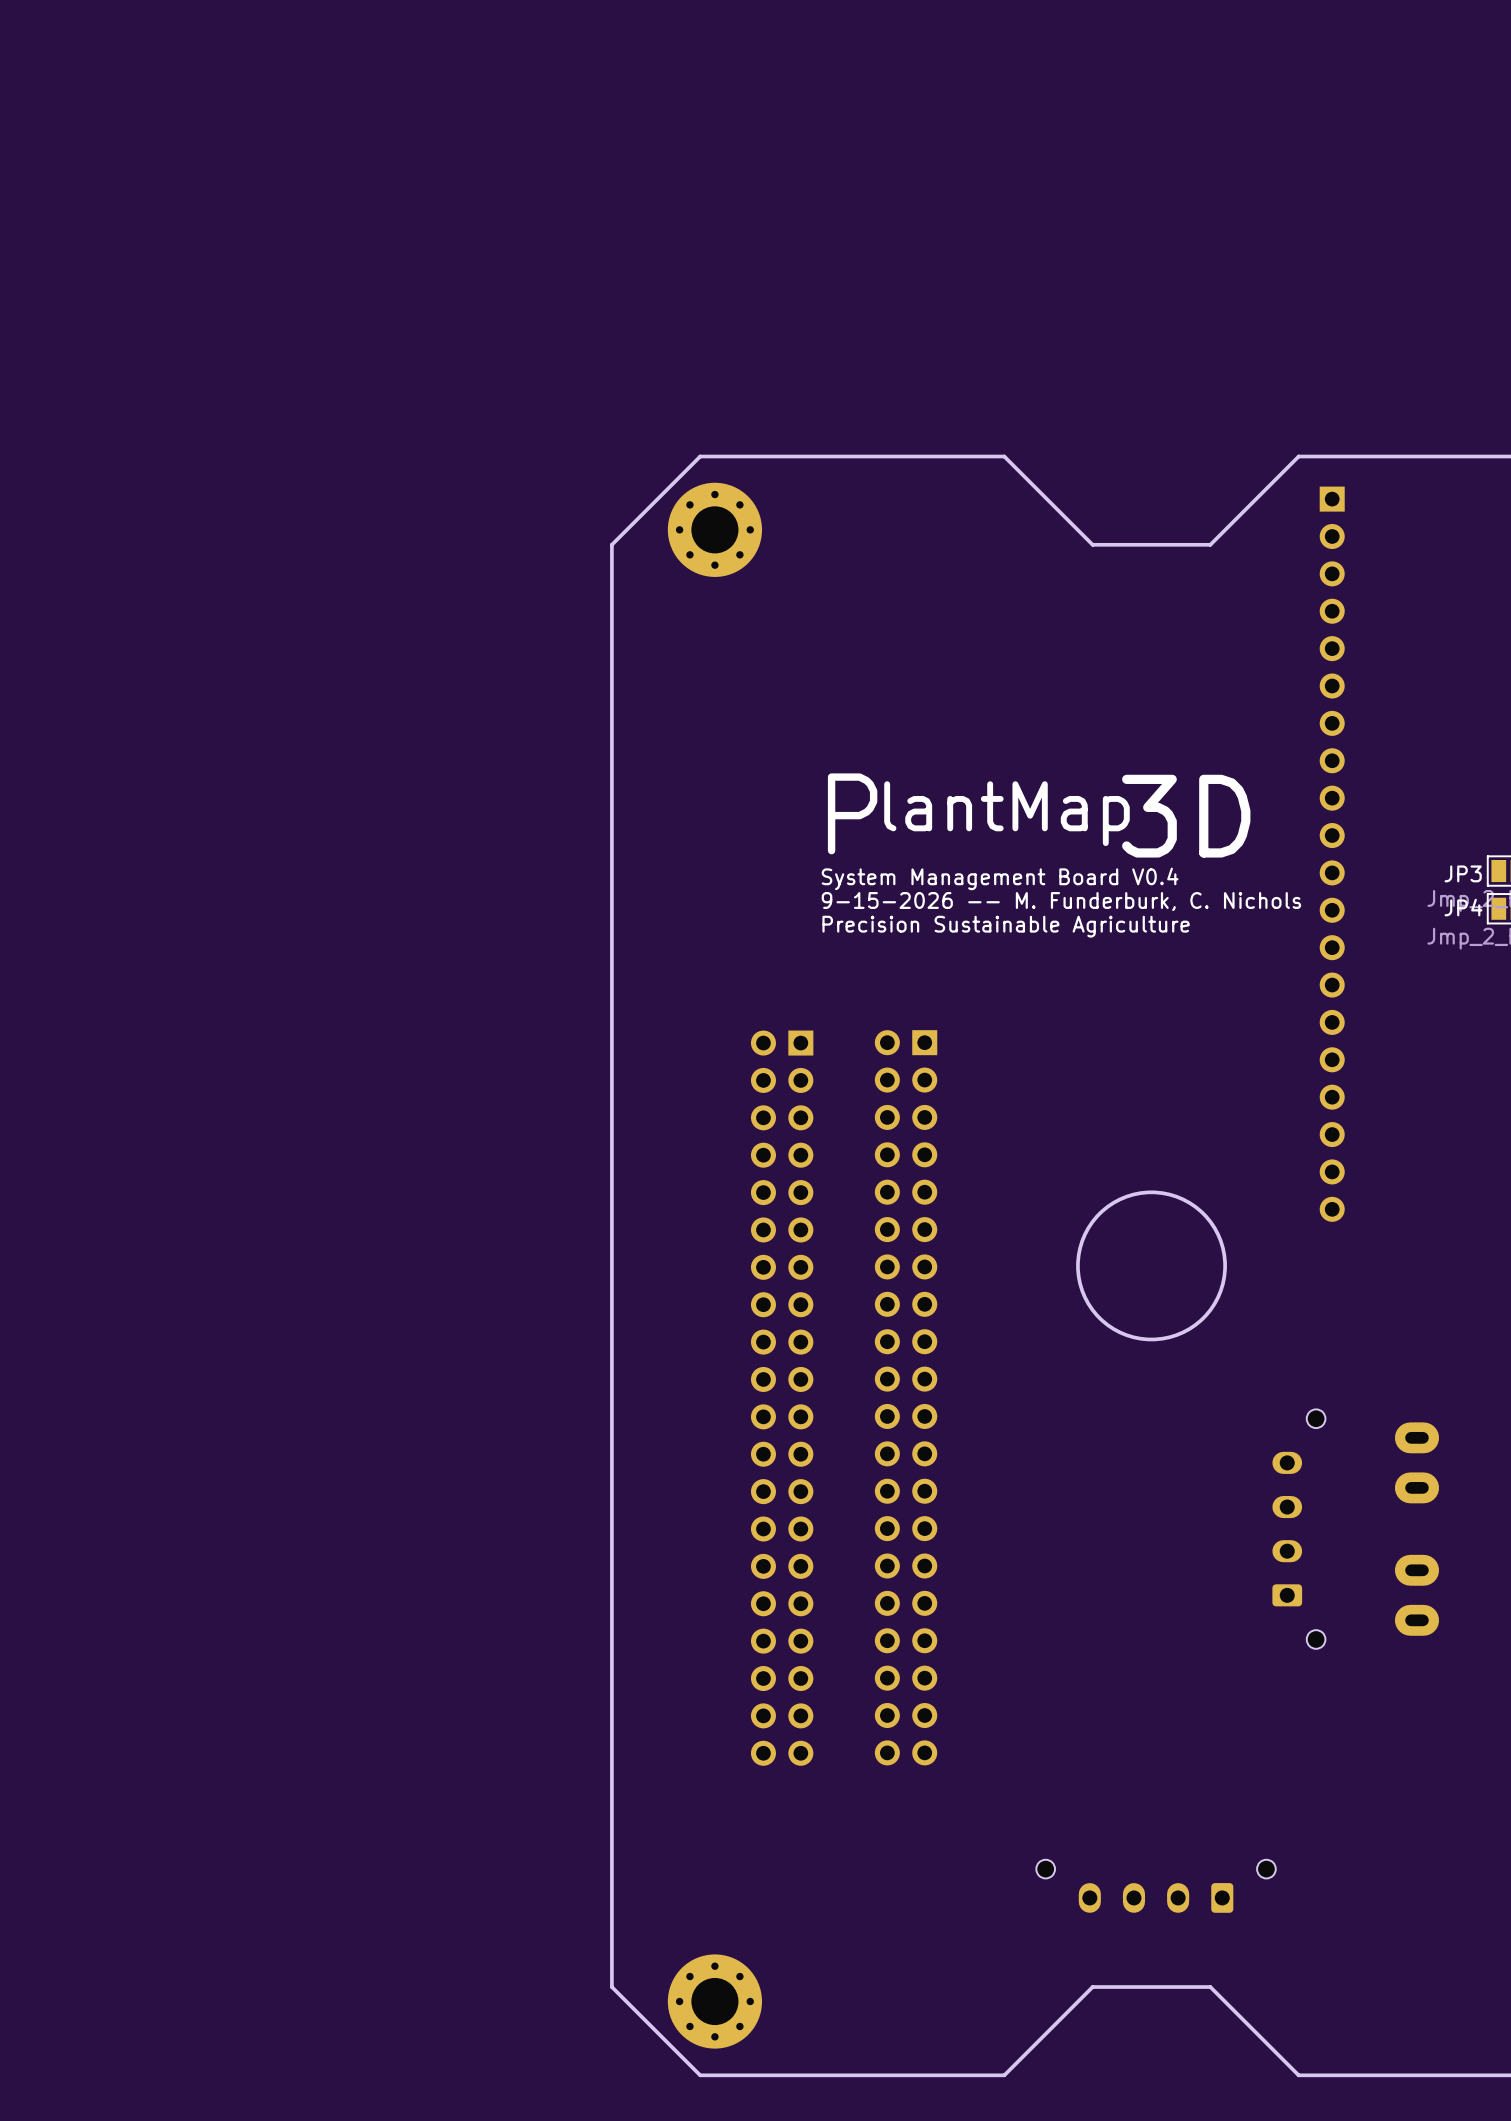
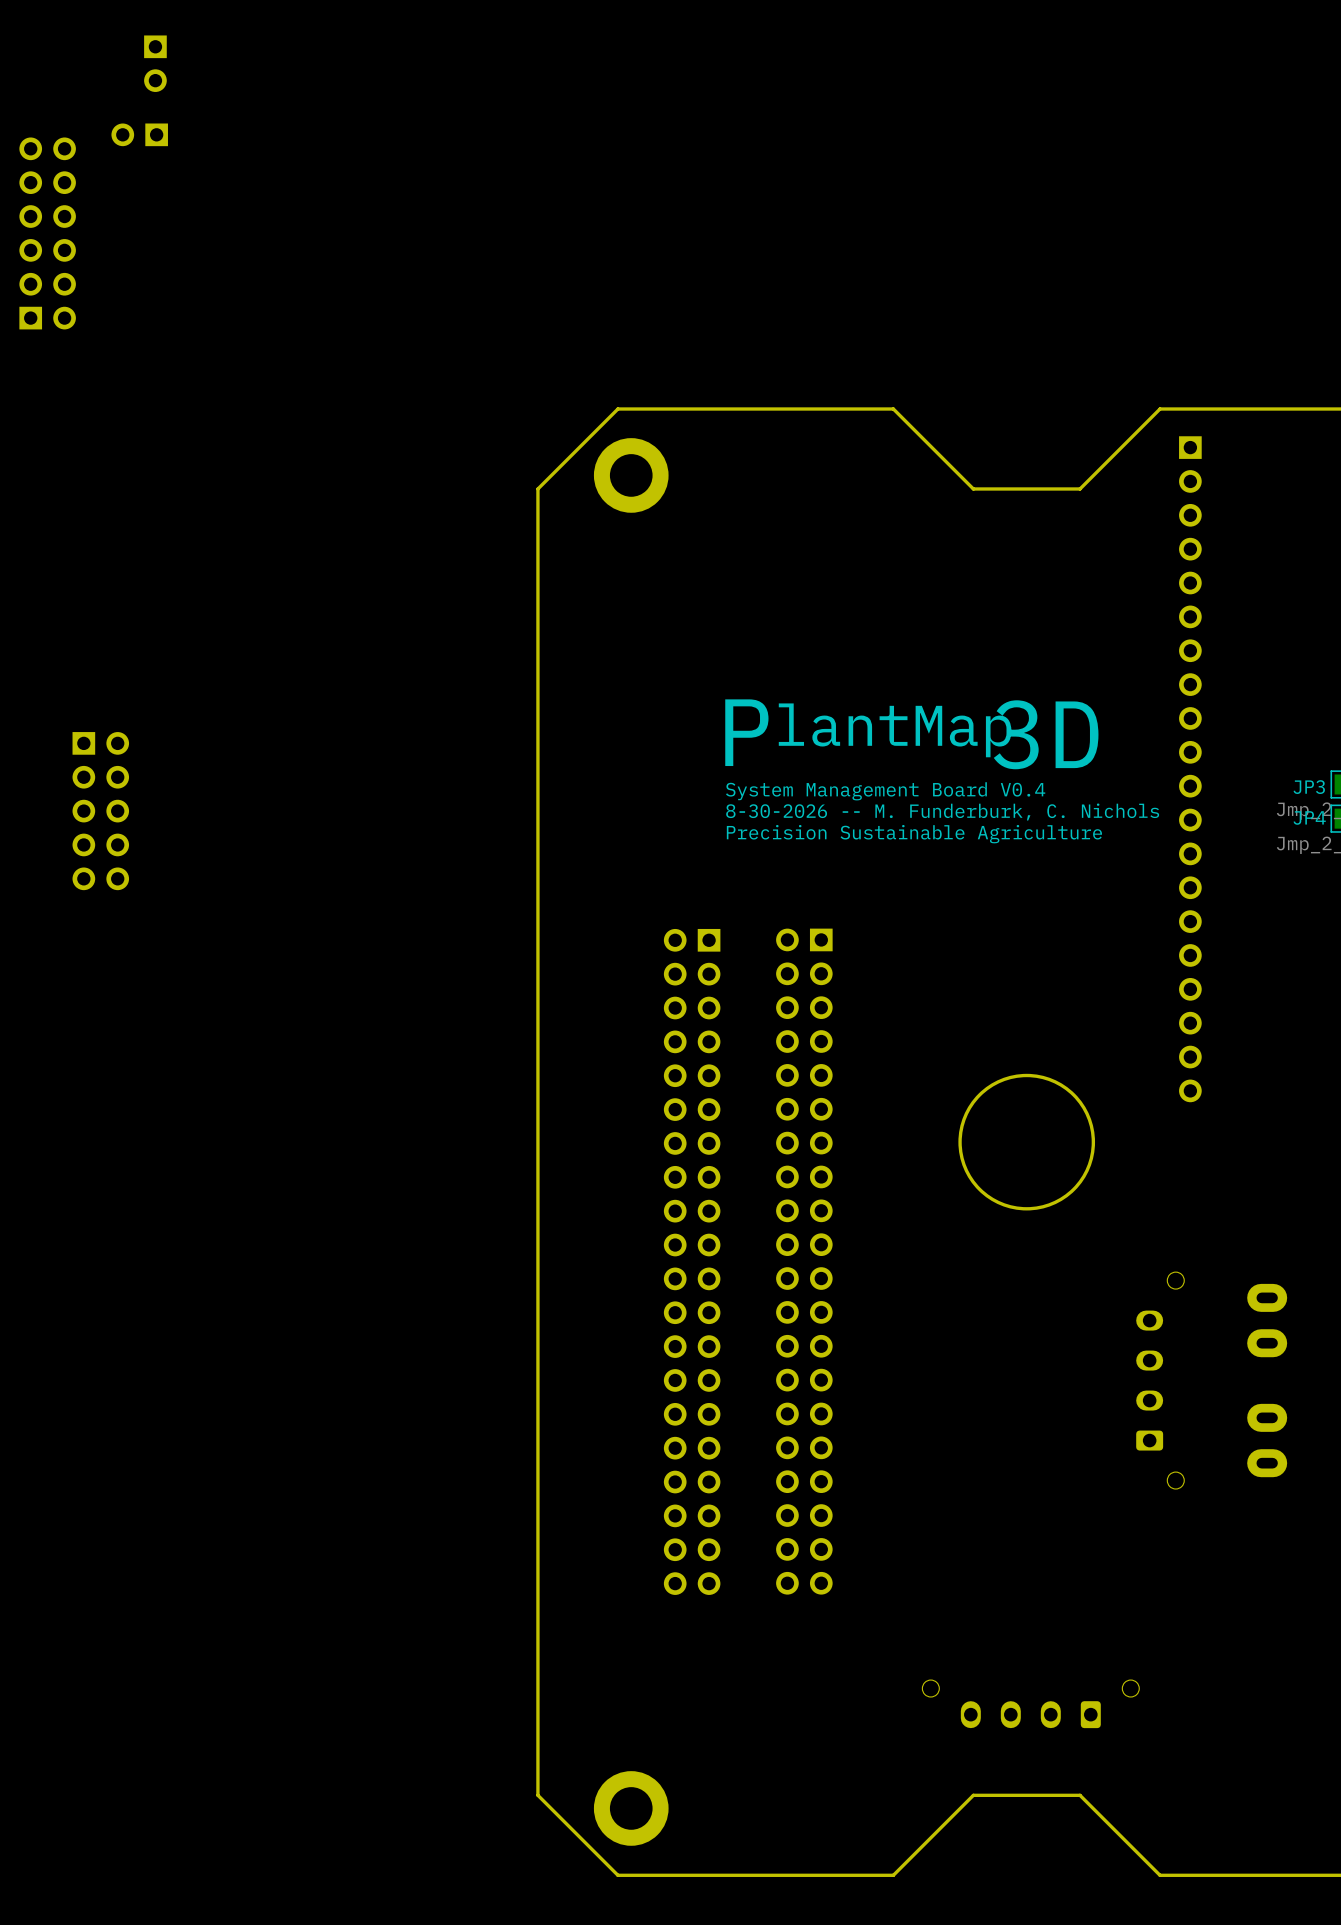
part: none -> (155, 63)
part: none -> (139, 134)
part: none -> (47, 233)
part footprint: [667, 482, 763, 577] -> [593, 438, 669, 513]
part: none -> (100, 811)
text: 9-15-2026 -- M. Funderburk, C. Nichols (1061, 901) -> 8-30-2026 -- M. Funderburk, C. Nichols (942, 812)
part footprint: [667, 1954, 763, 2049] -> [593, 1771, 669, 1846]

